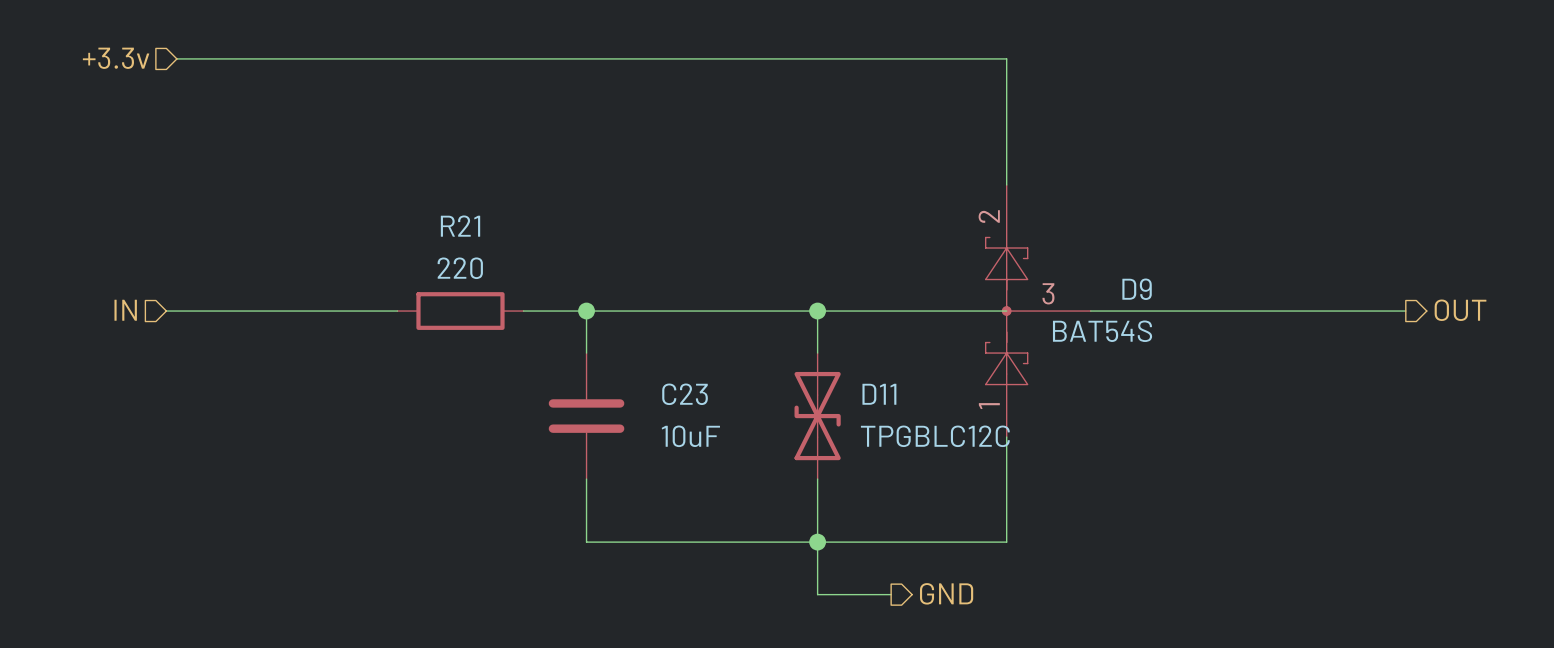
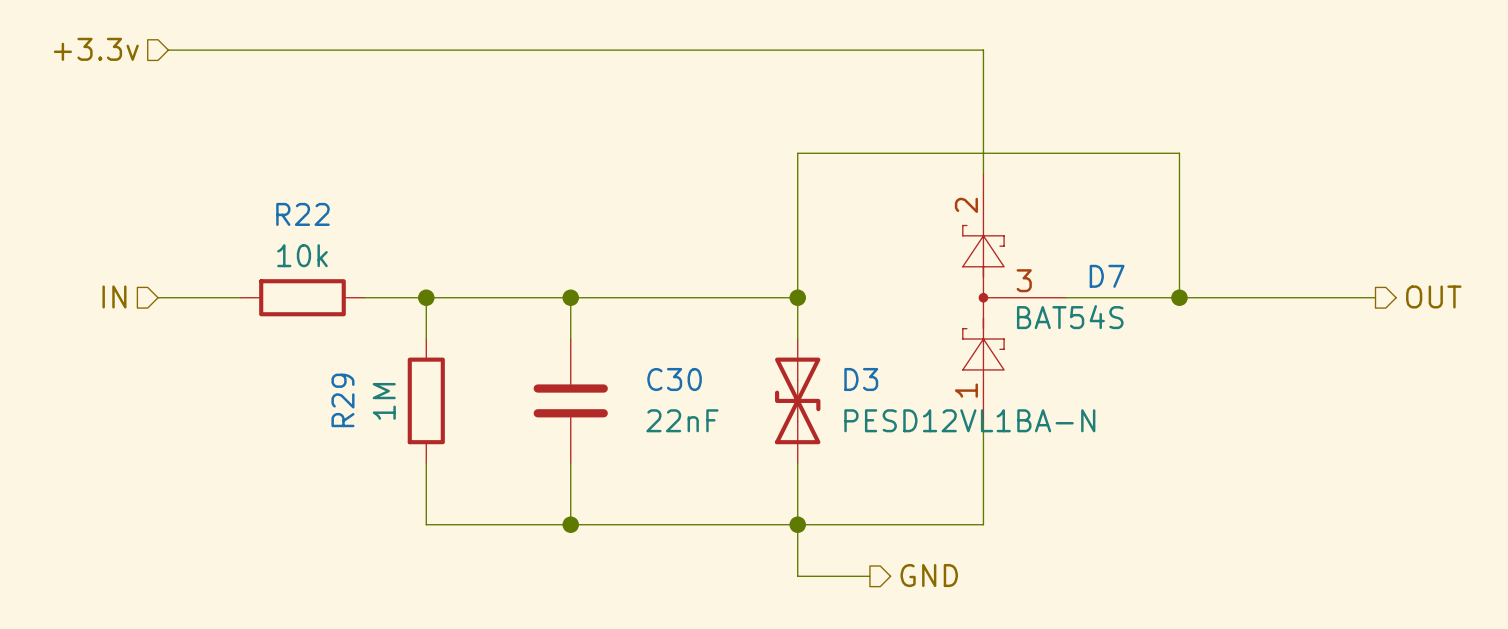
D9 name: D9 (1137, 289) -> D7 (1107, 276)
wire: (250, 311) (376, 311) -> (385, 297) (508, 297)
R22: none -> 10k (302, 297)
wire: none -> (426, 297) (426, 339)
junction: none -> (426, 297)
R21: 220 (460, 311) -> none
wire: (817, 311) (1006, 311) -> (797, 297) (797, 153) (1179, 153) (1179, 297)
junction: none -> (1179, 297)
C23 name: C23 (685, 394) -> C30 (674, 379)
D11 name: D11 (879, 394) -> D3 (861, 379)
R29: none -> 1M (426, 400)
C23 value: 10uF (690, 436) -> 22nF (682, 420)
D11 value: TPGBLC12C (935, 436) -> PESD12VL1BA-N (969, 420)
wire: none -> (426, 462) (426, 524) (570, 524)
junction: none -> (570, 524)

